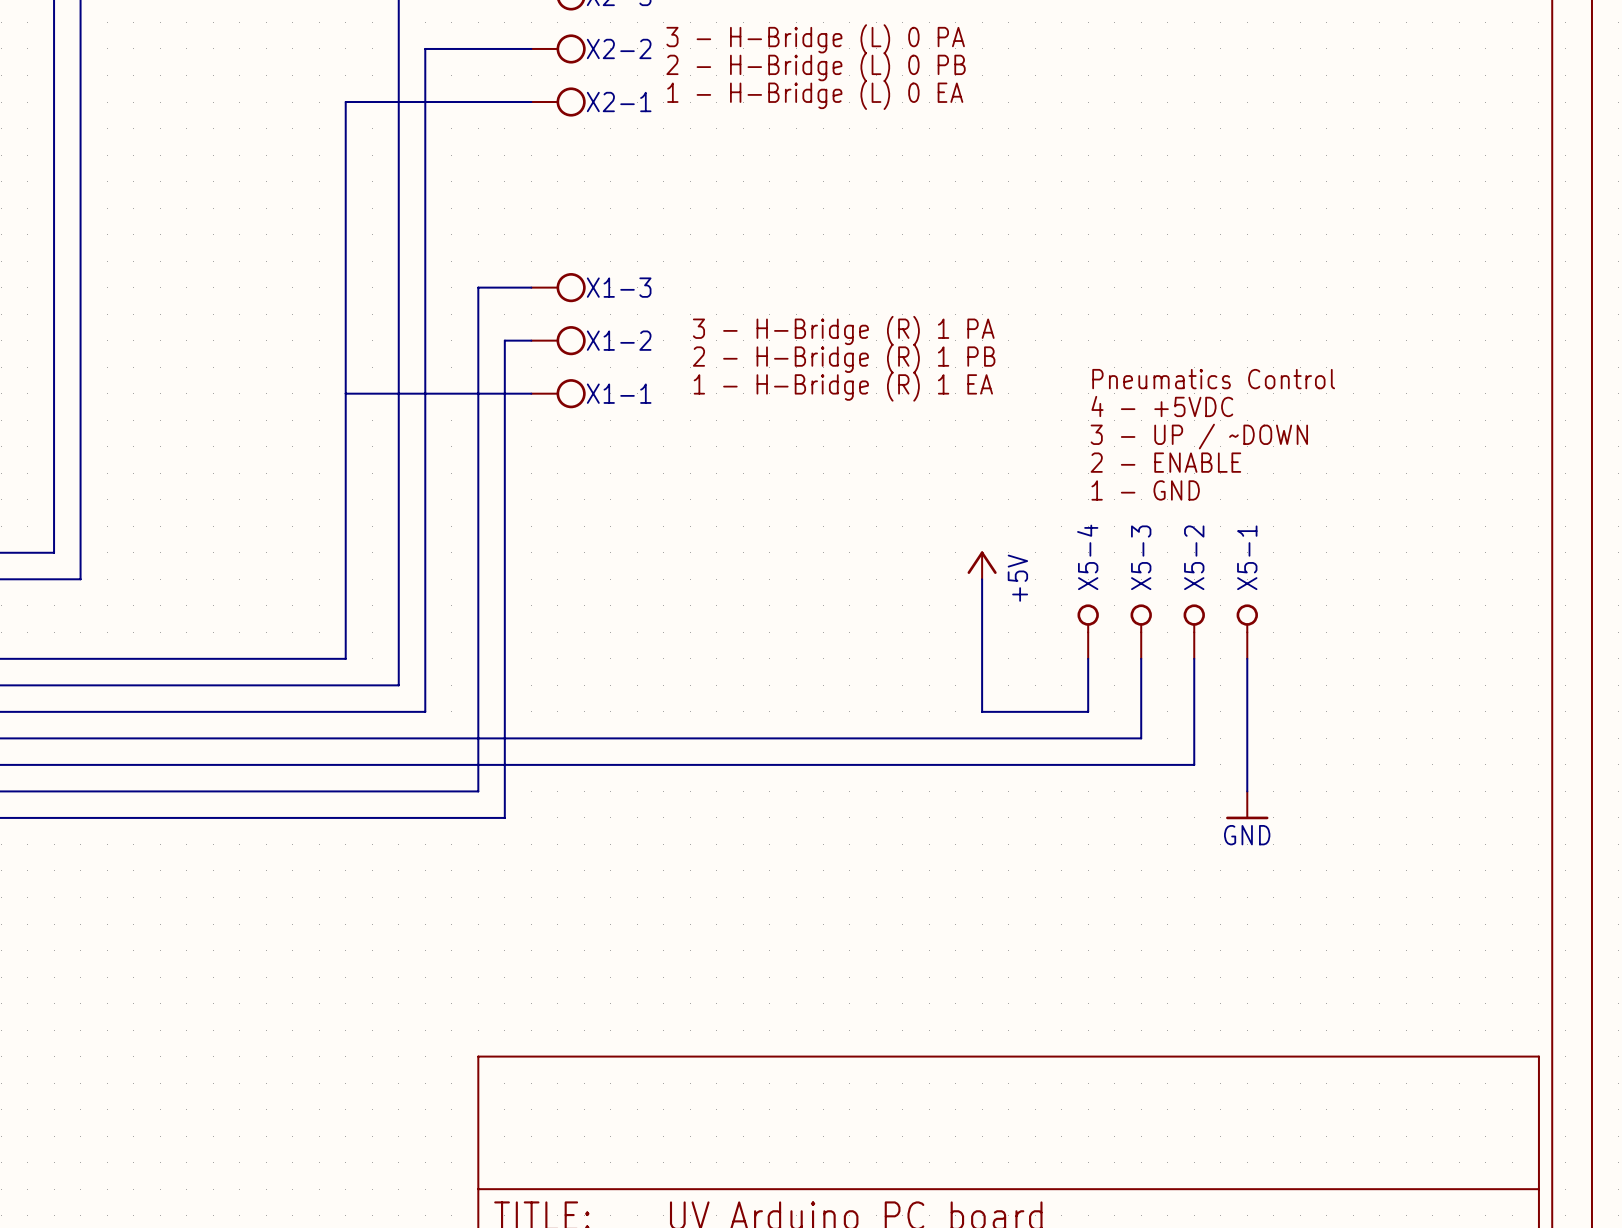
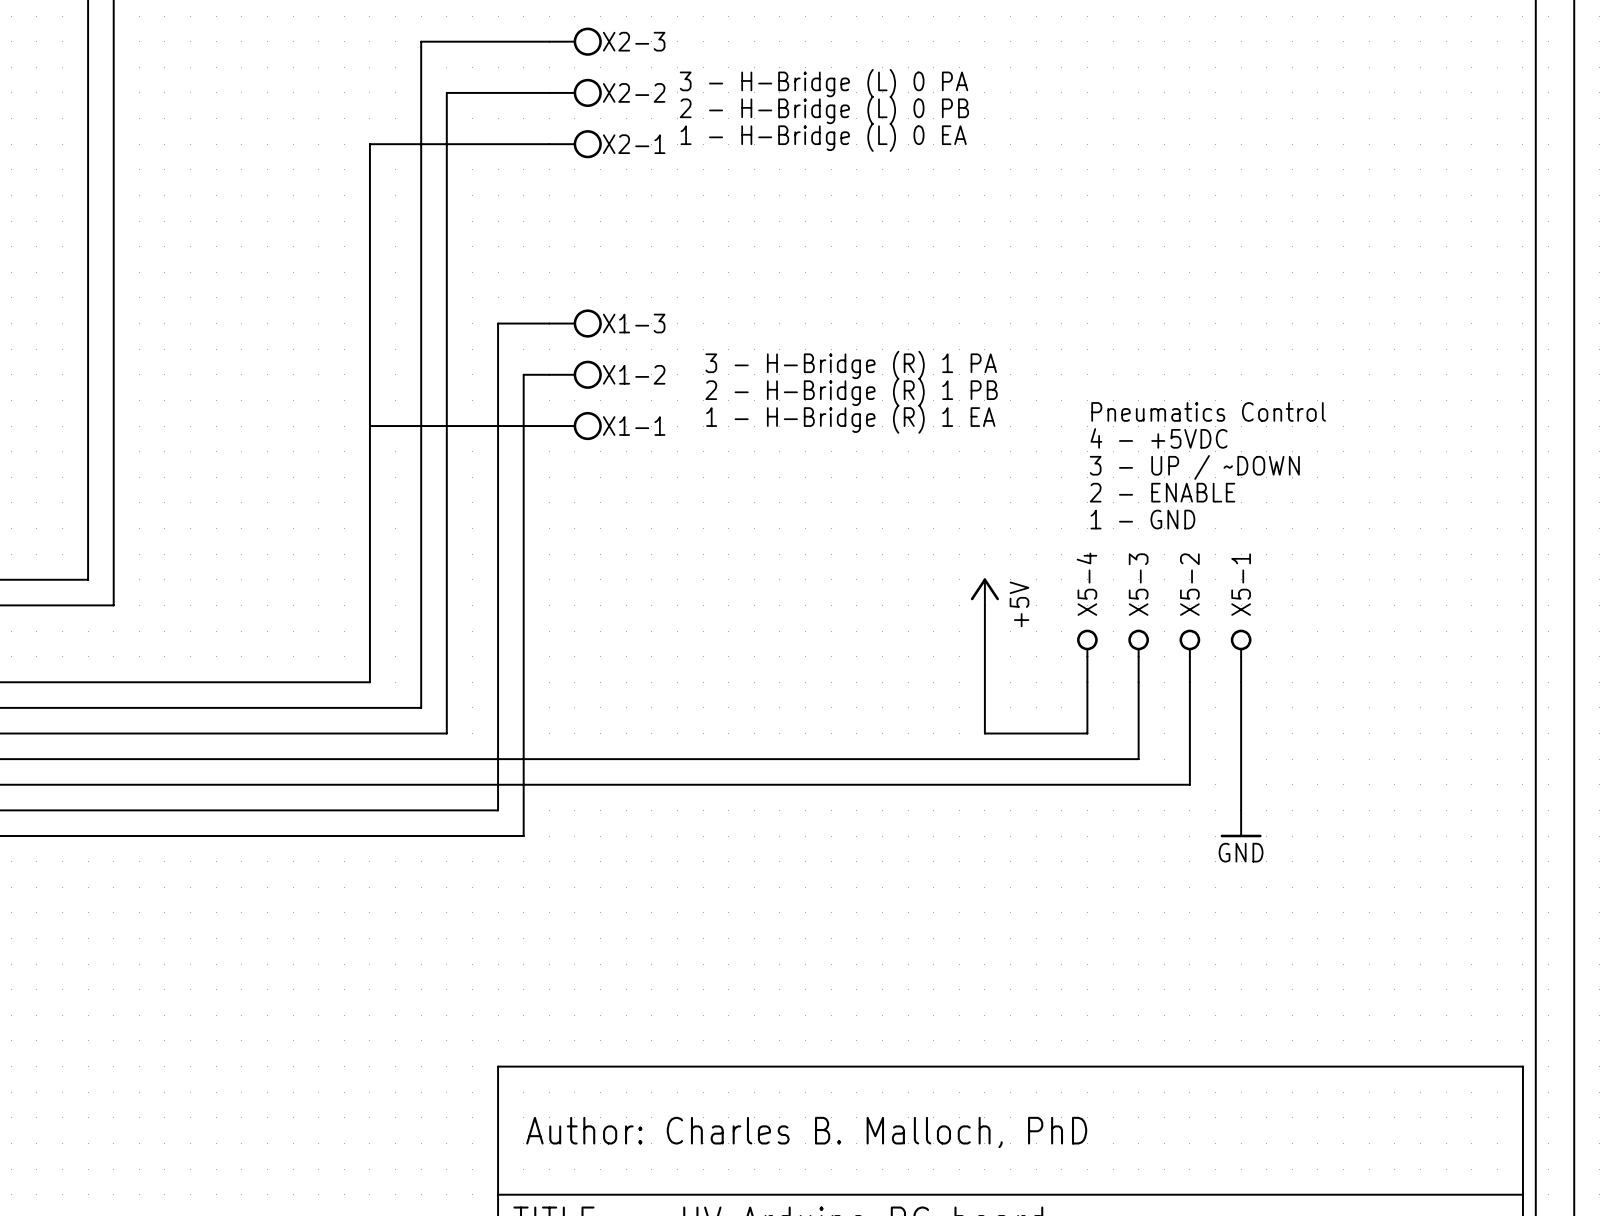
text: none -> Author: Charles B. Malloch, PhD (806, 1132)

